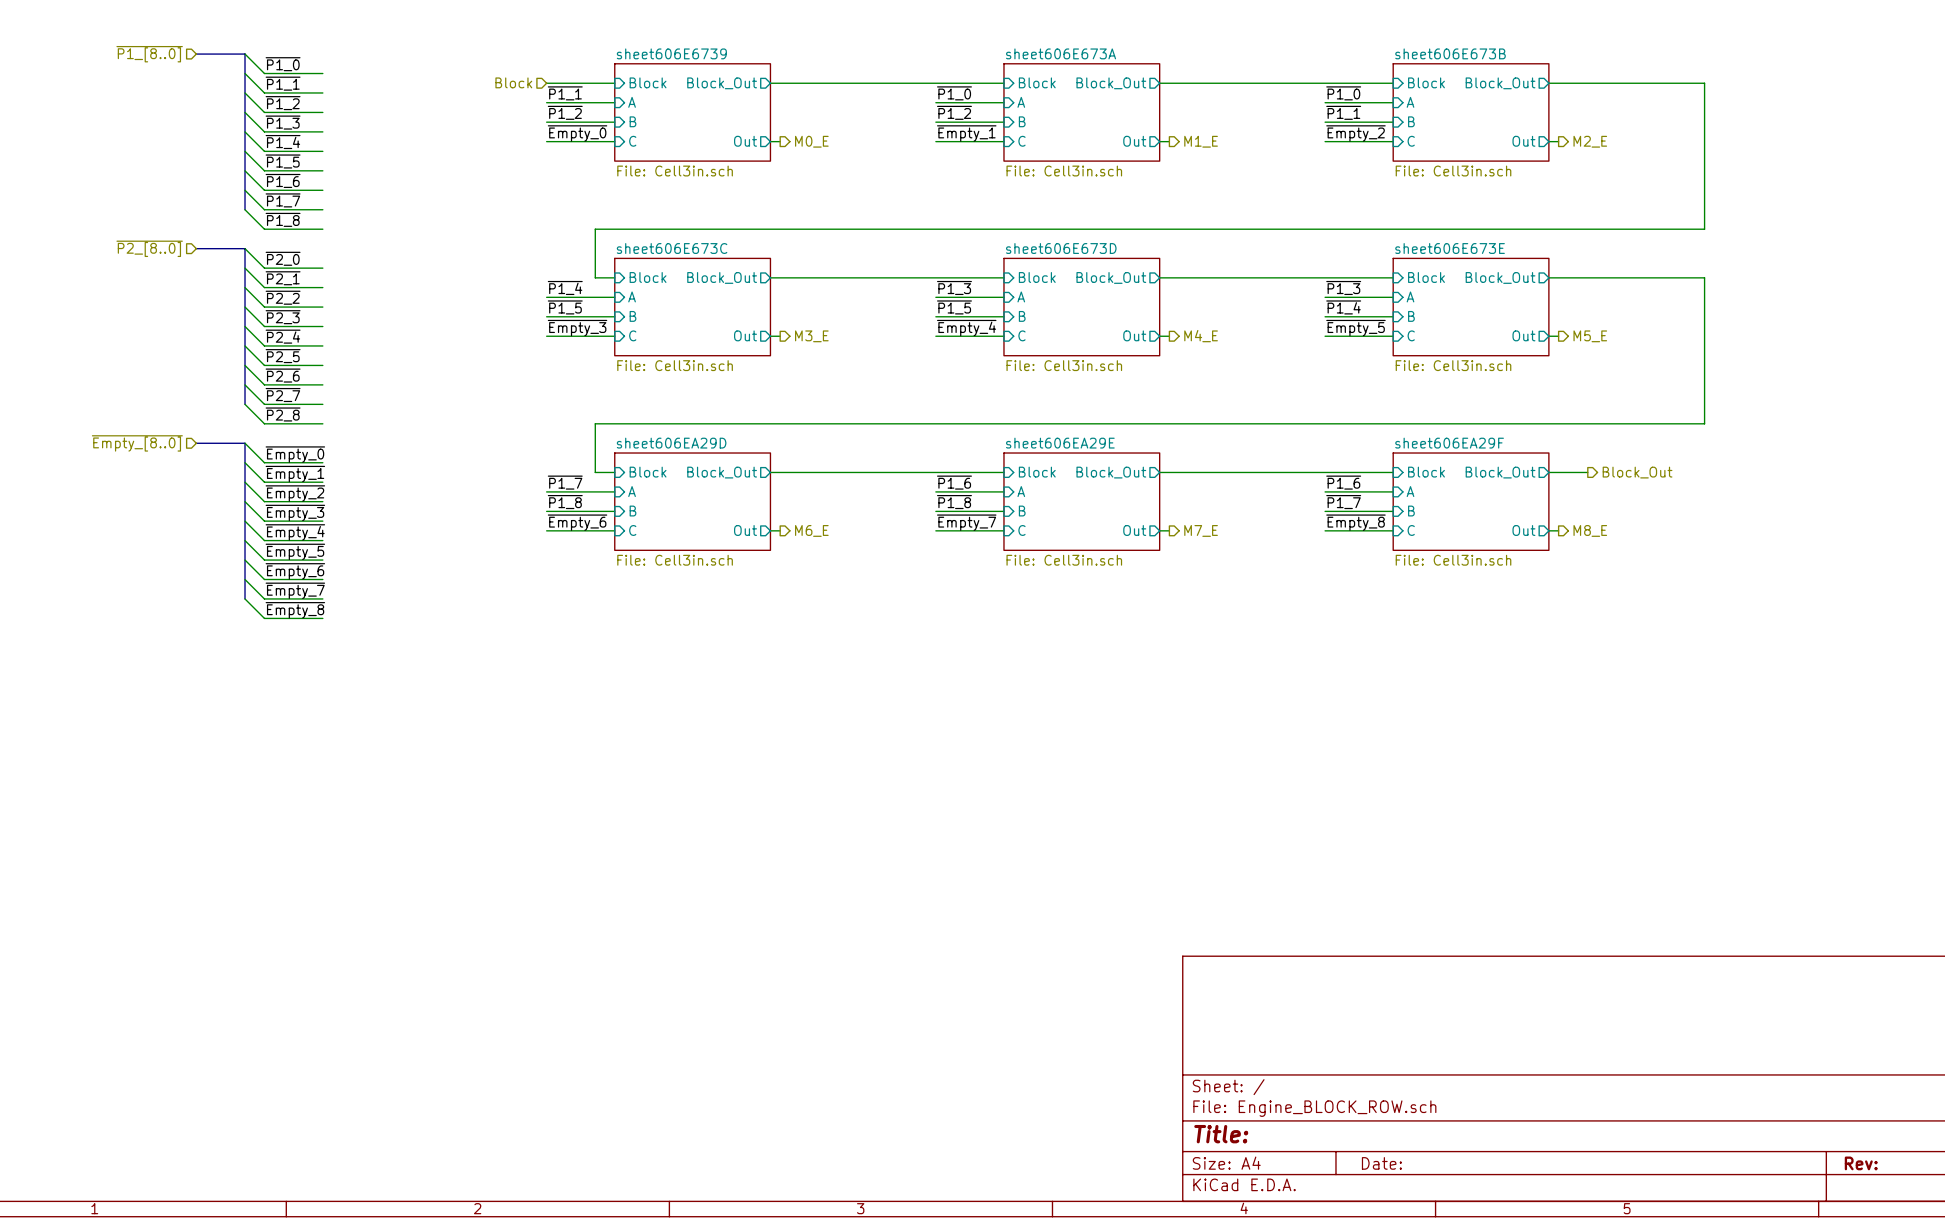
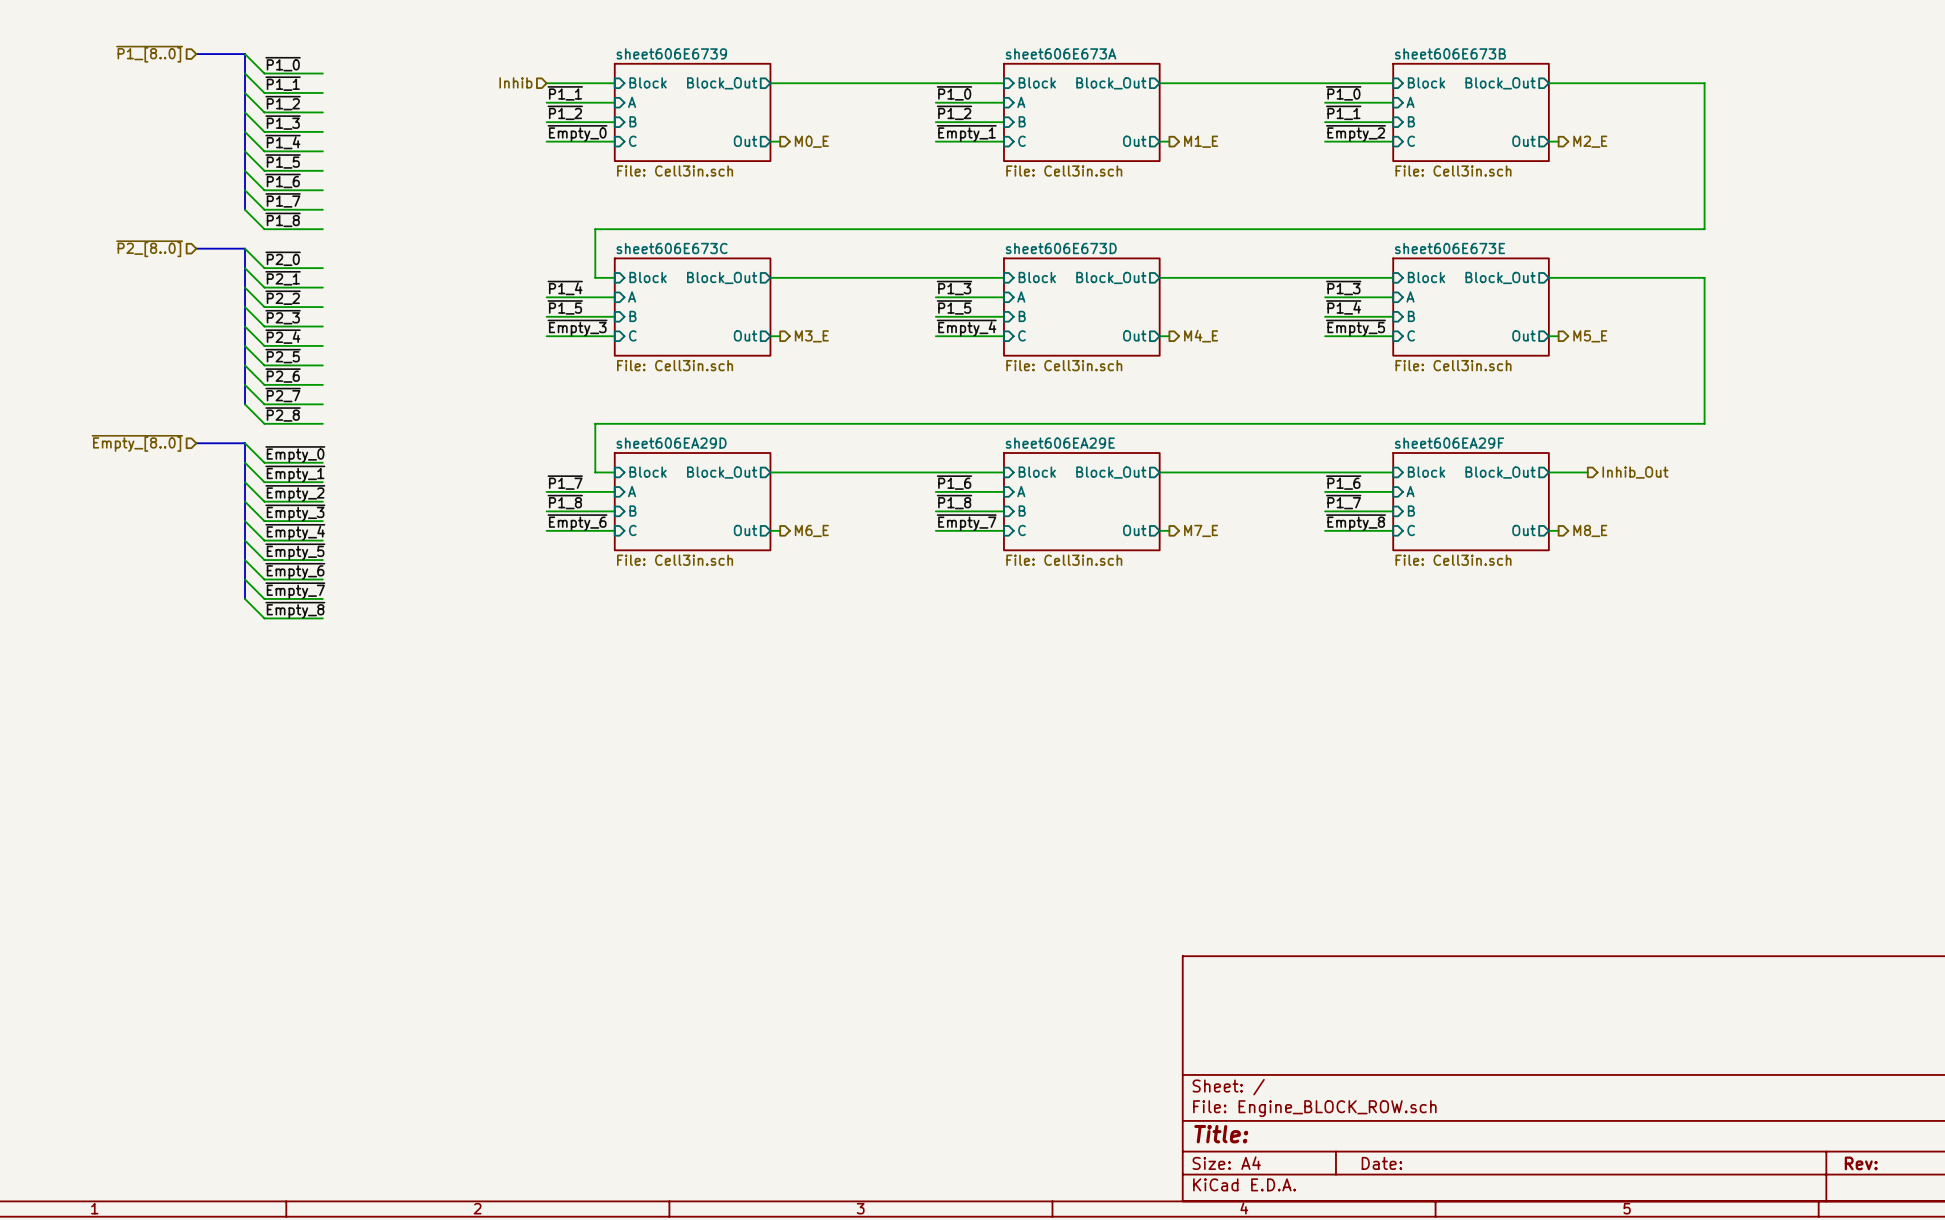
hierarchical label: Block (513, 82) -> Inhib (515, 82)
hierarchical label: Block_Out (1637, 472) -> Inhib_Out (1635, 472)

